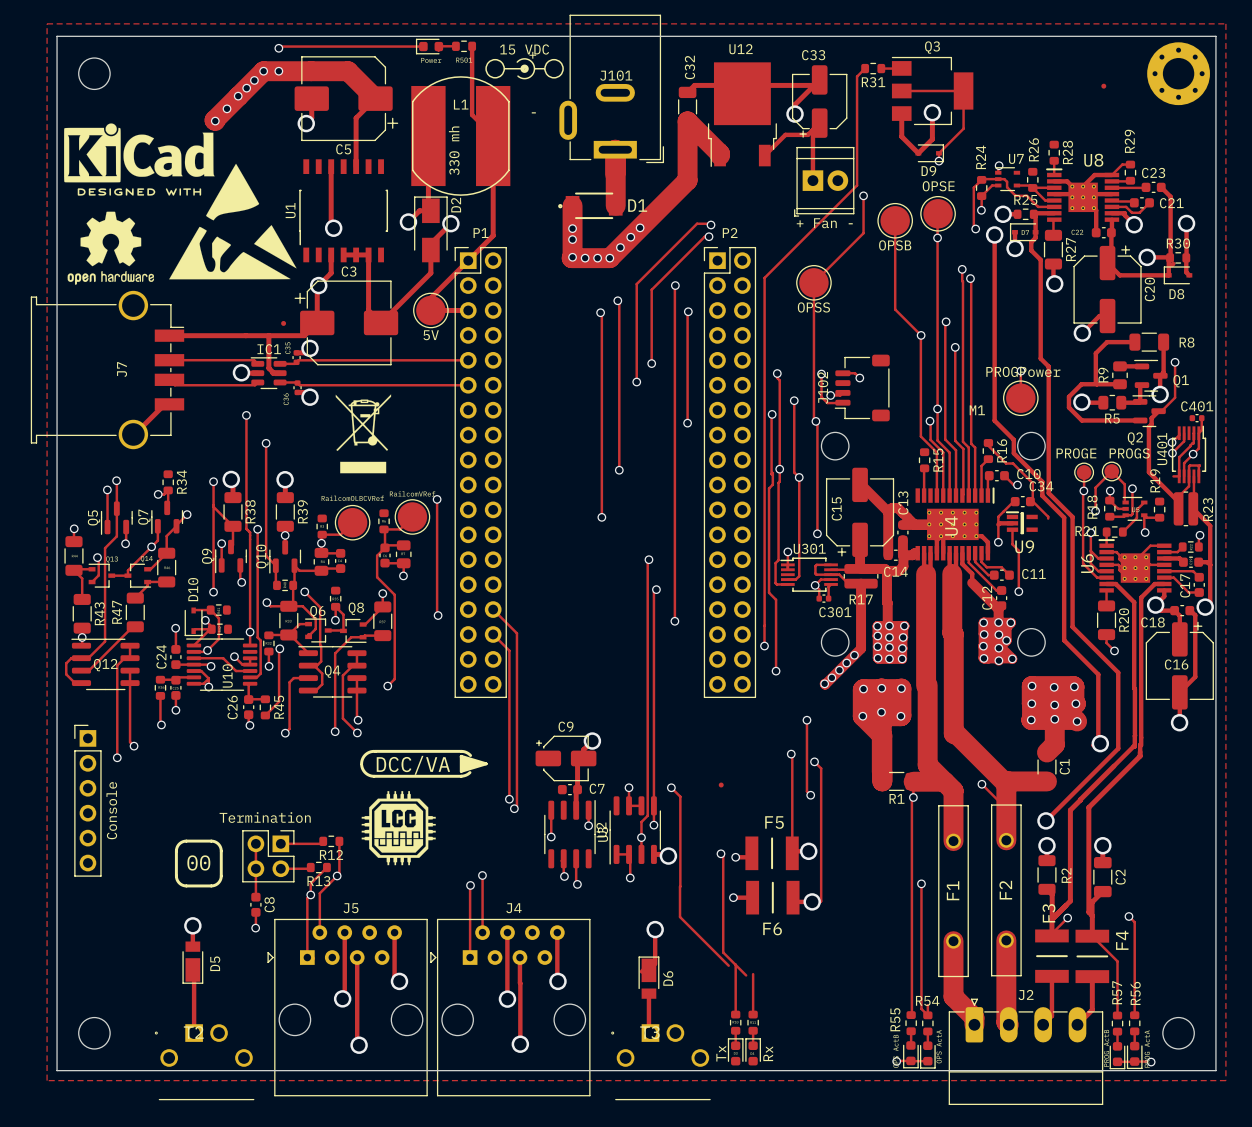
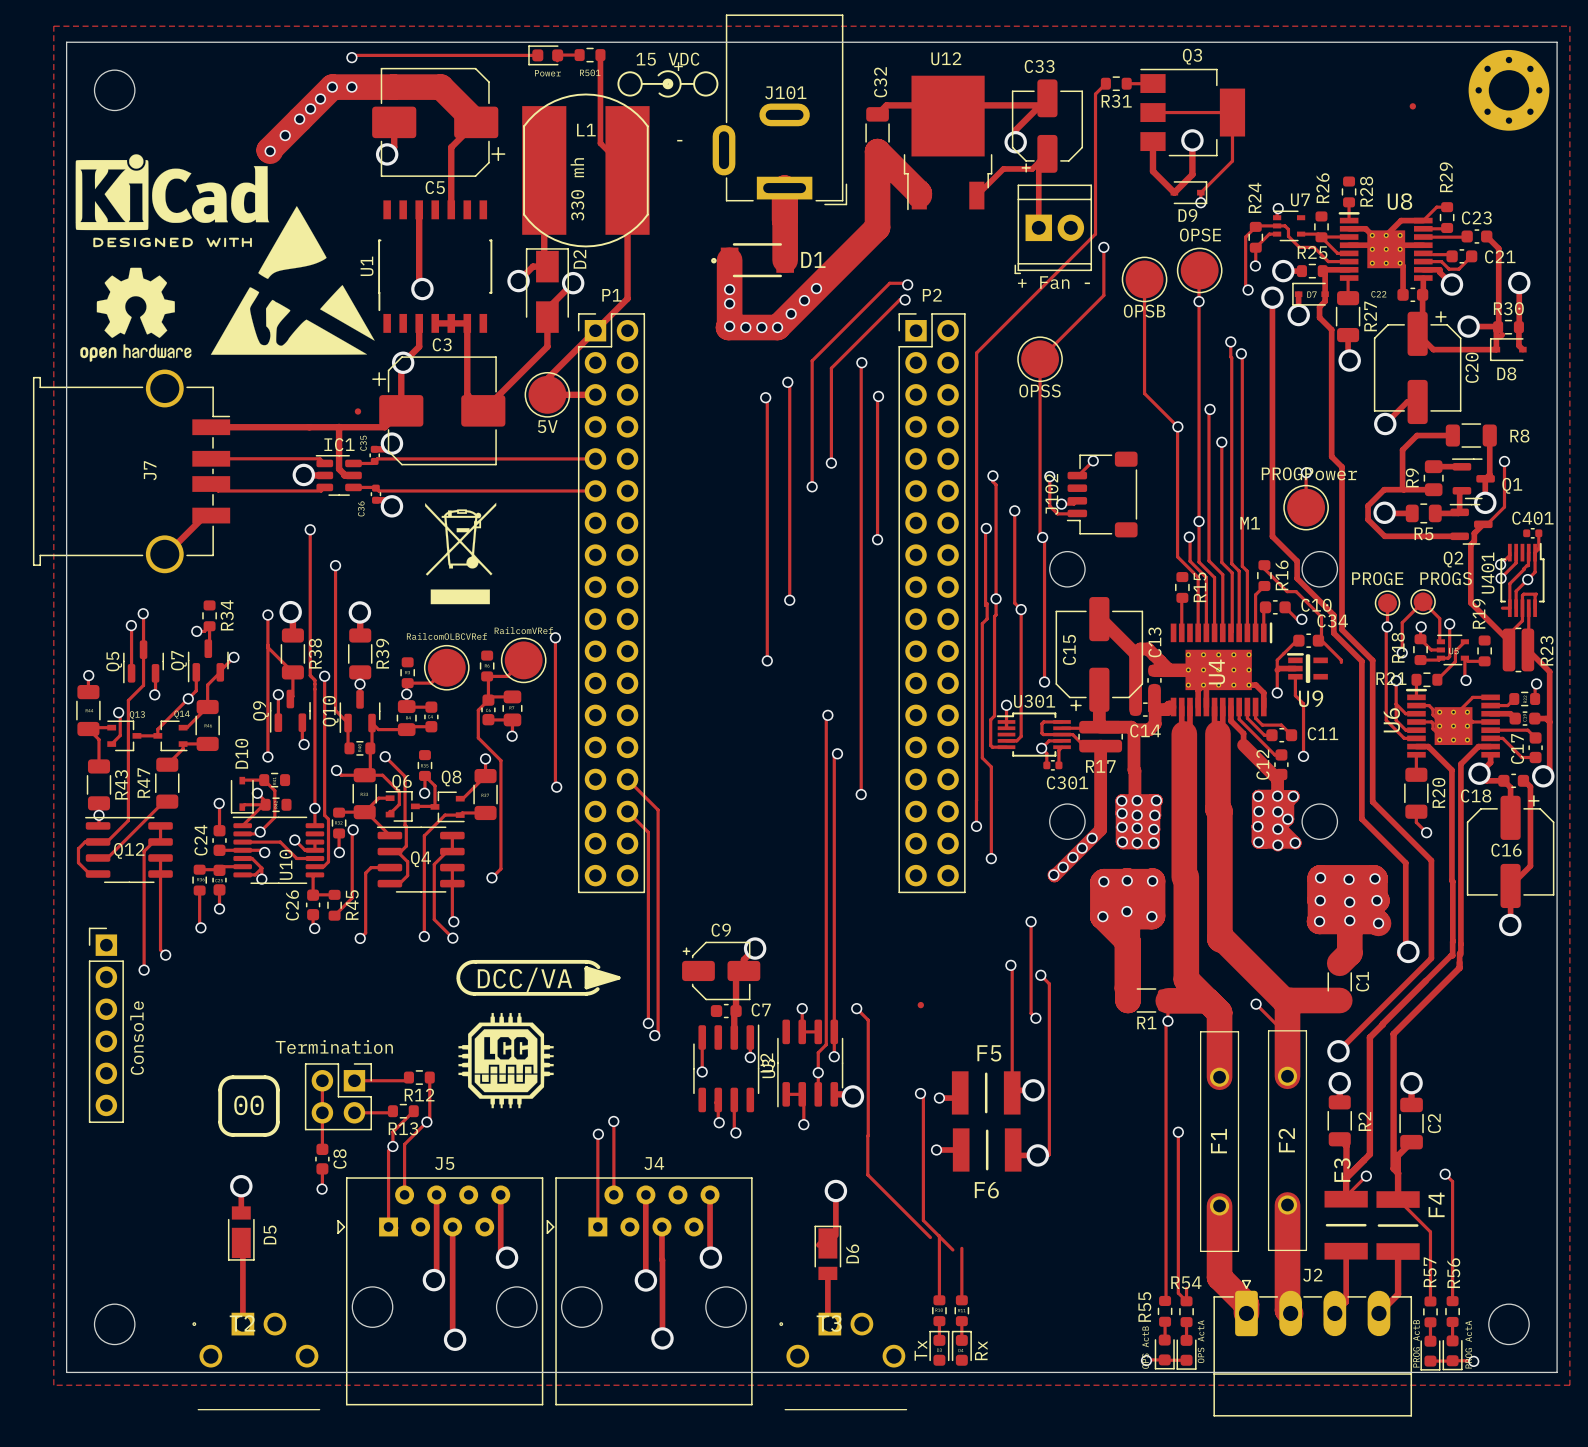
track: (843, 373) (855, 373) (859, 378) -> (1078, 475) (1093, 460)
via position: (859, 378) -> (1093, 460)

